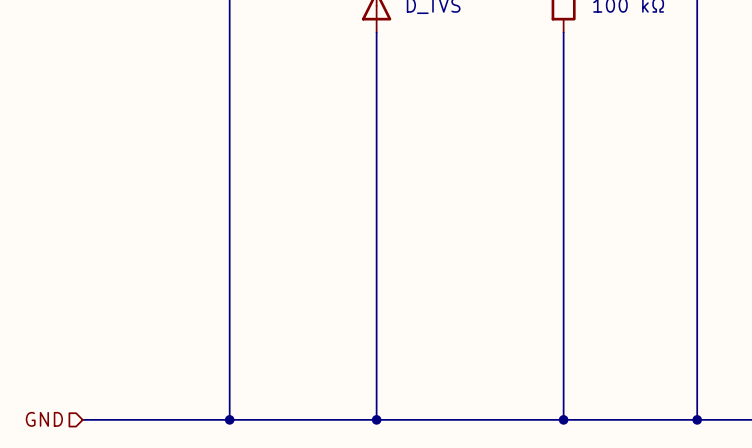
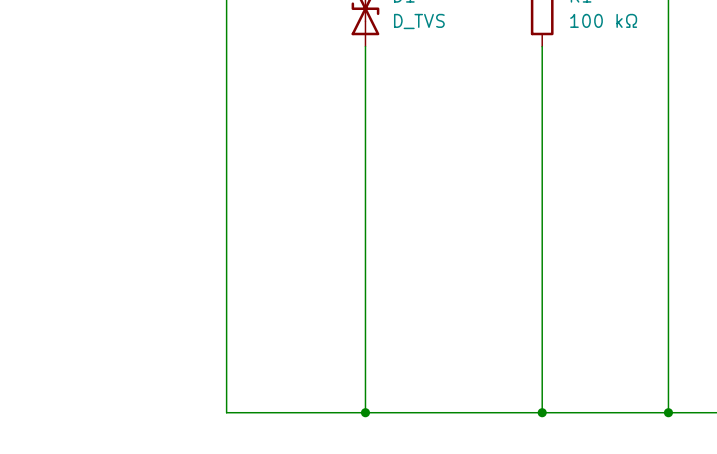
hierarchical label: GND (44, 419) -> none
wire: (82, 419) (229, 419) -> none
junction: (229, 419) -> none

